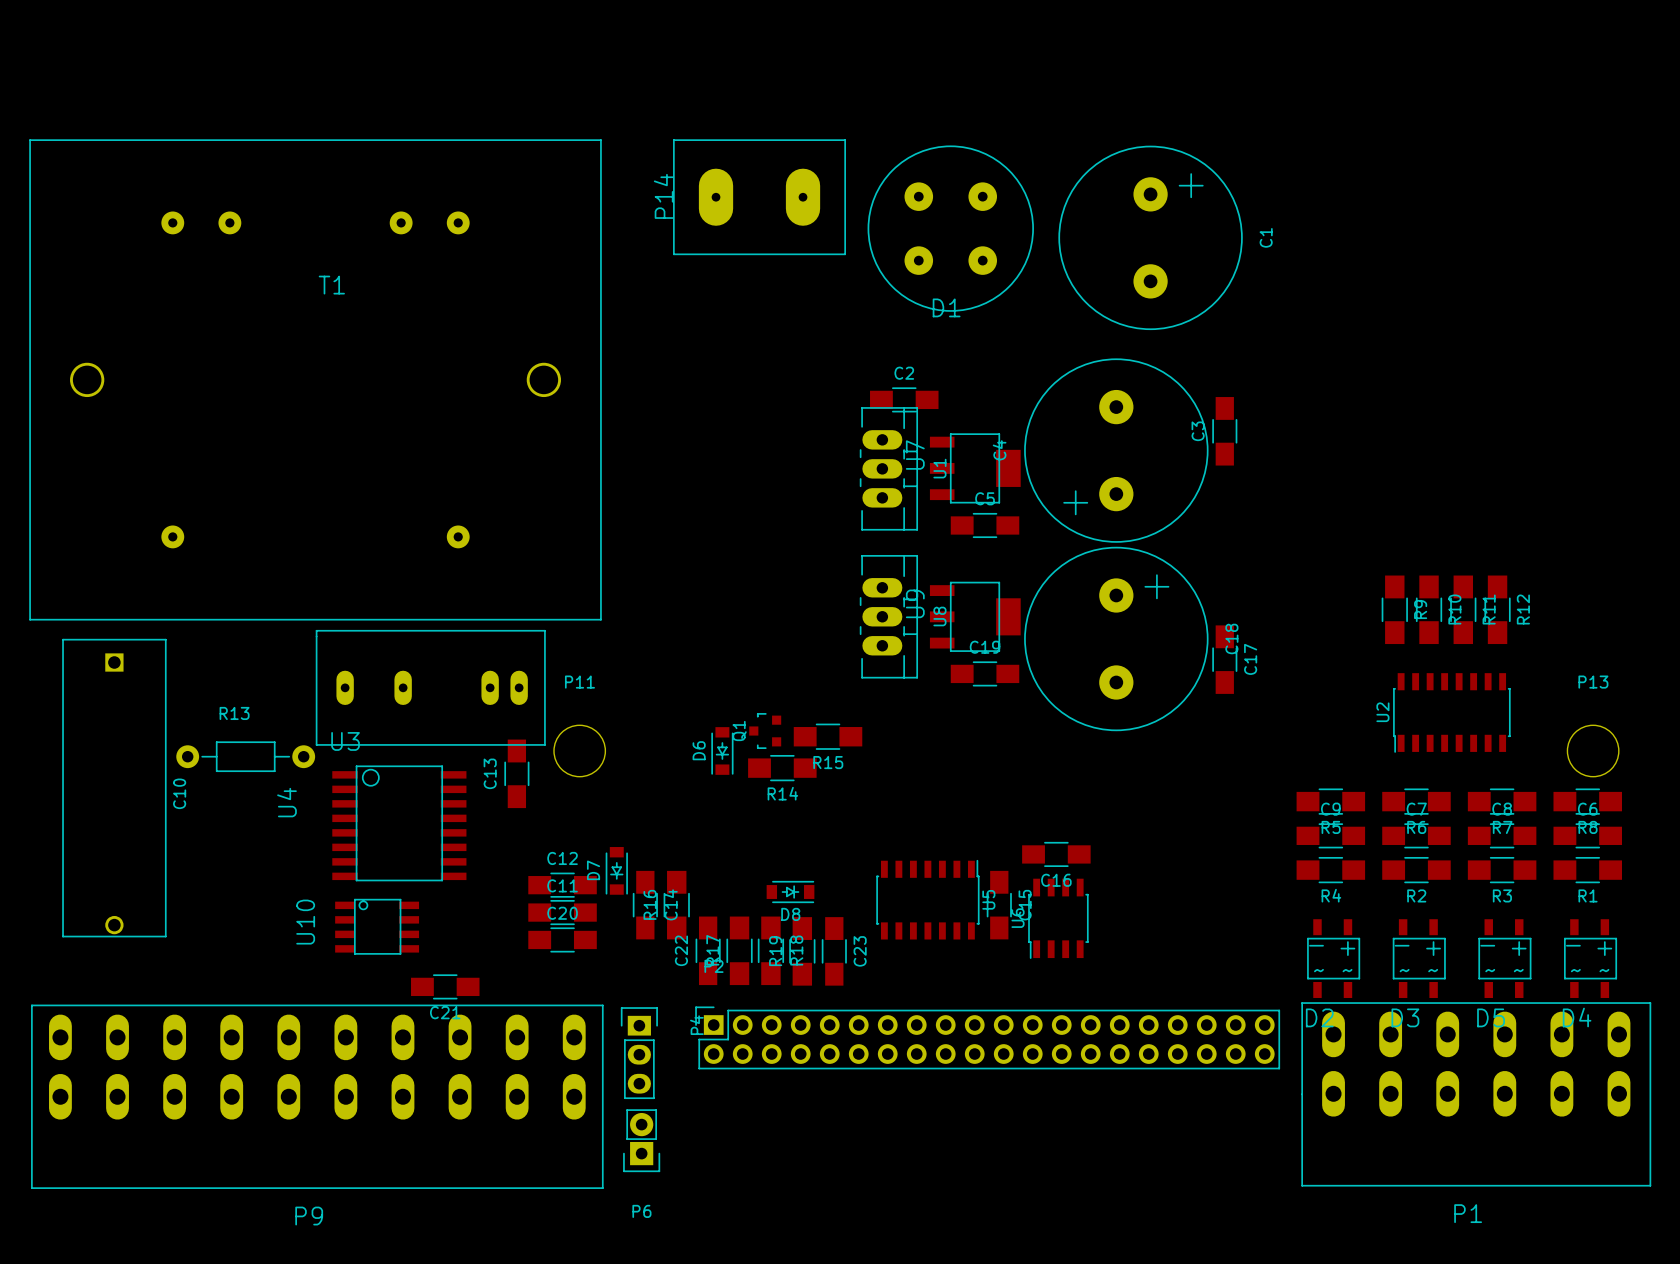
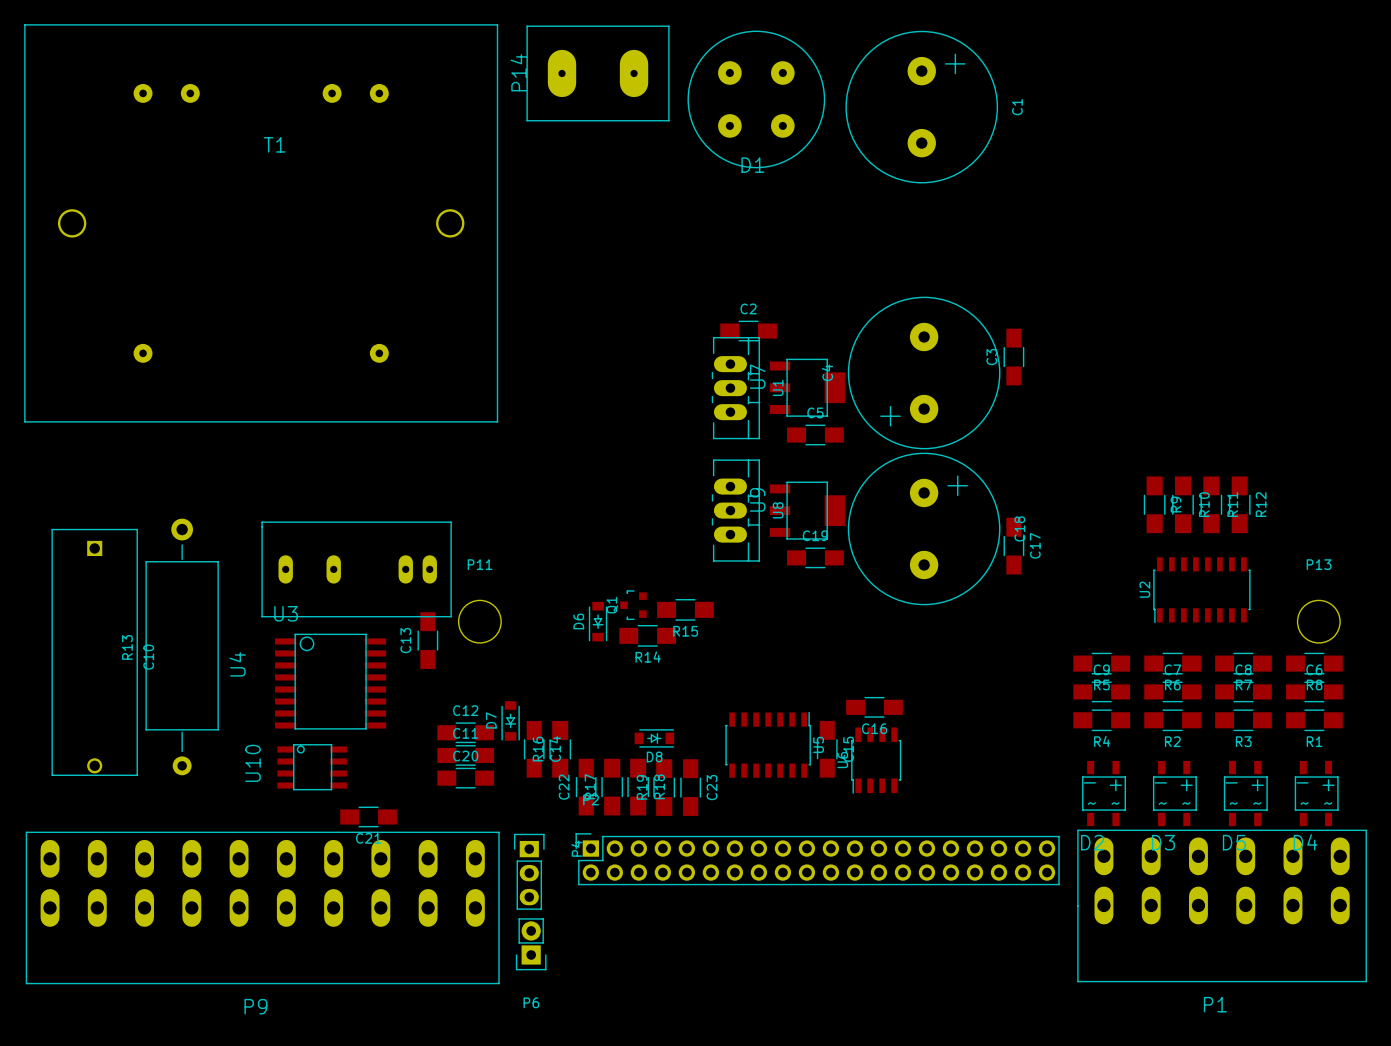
P14 position: (759, 197) -> (598, 73)
D1 position: (950, 228) -> (756, 99)
C1 position: (1150, 237) -> (921, 107)
T1 position: (315, 379) -> (261, 223)
R13 name position: R13 (234, 713) -> R13 (127, 647)
R13 footprint: [176, 741, 316, 773] -> [145, 518, 219, 776]

